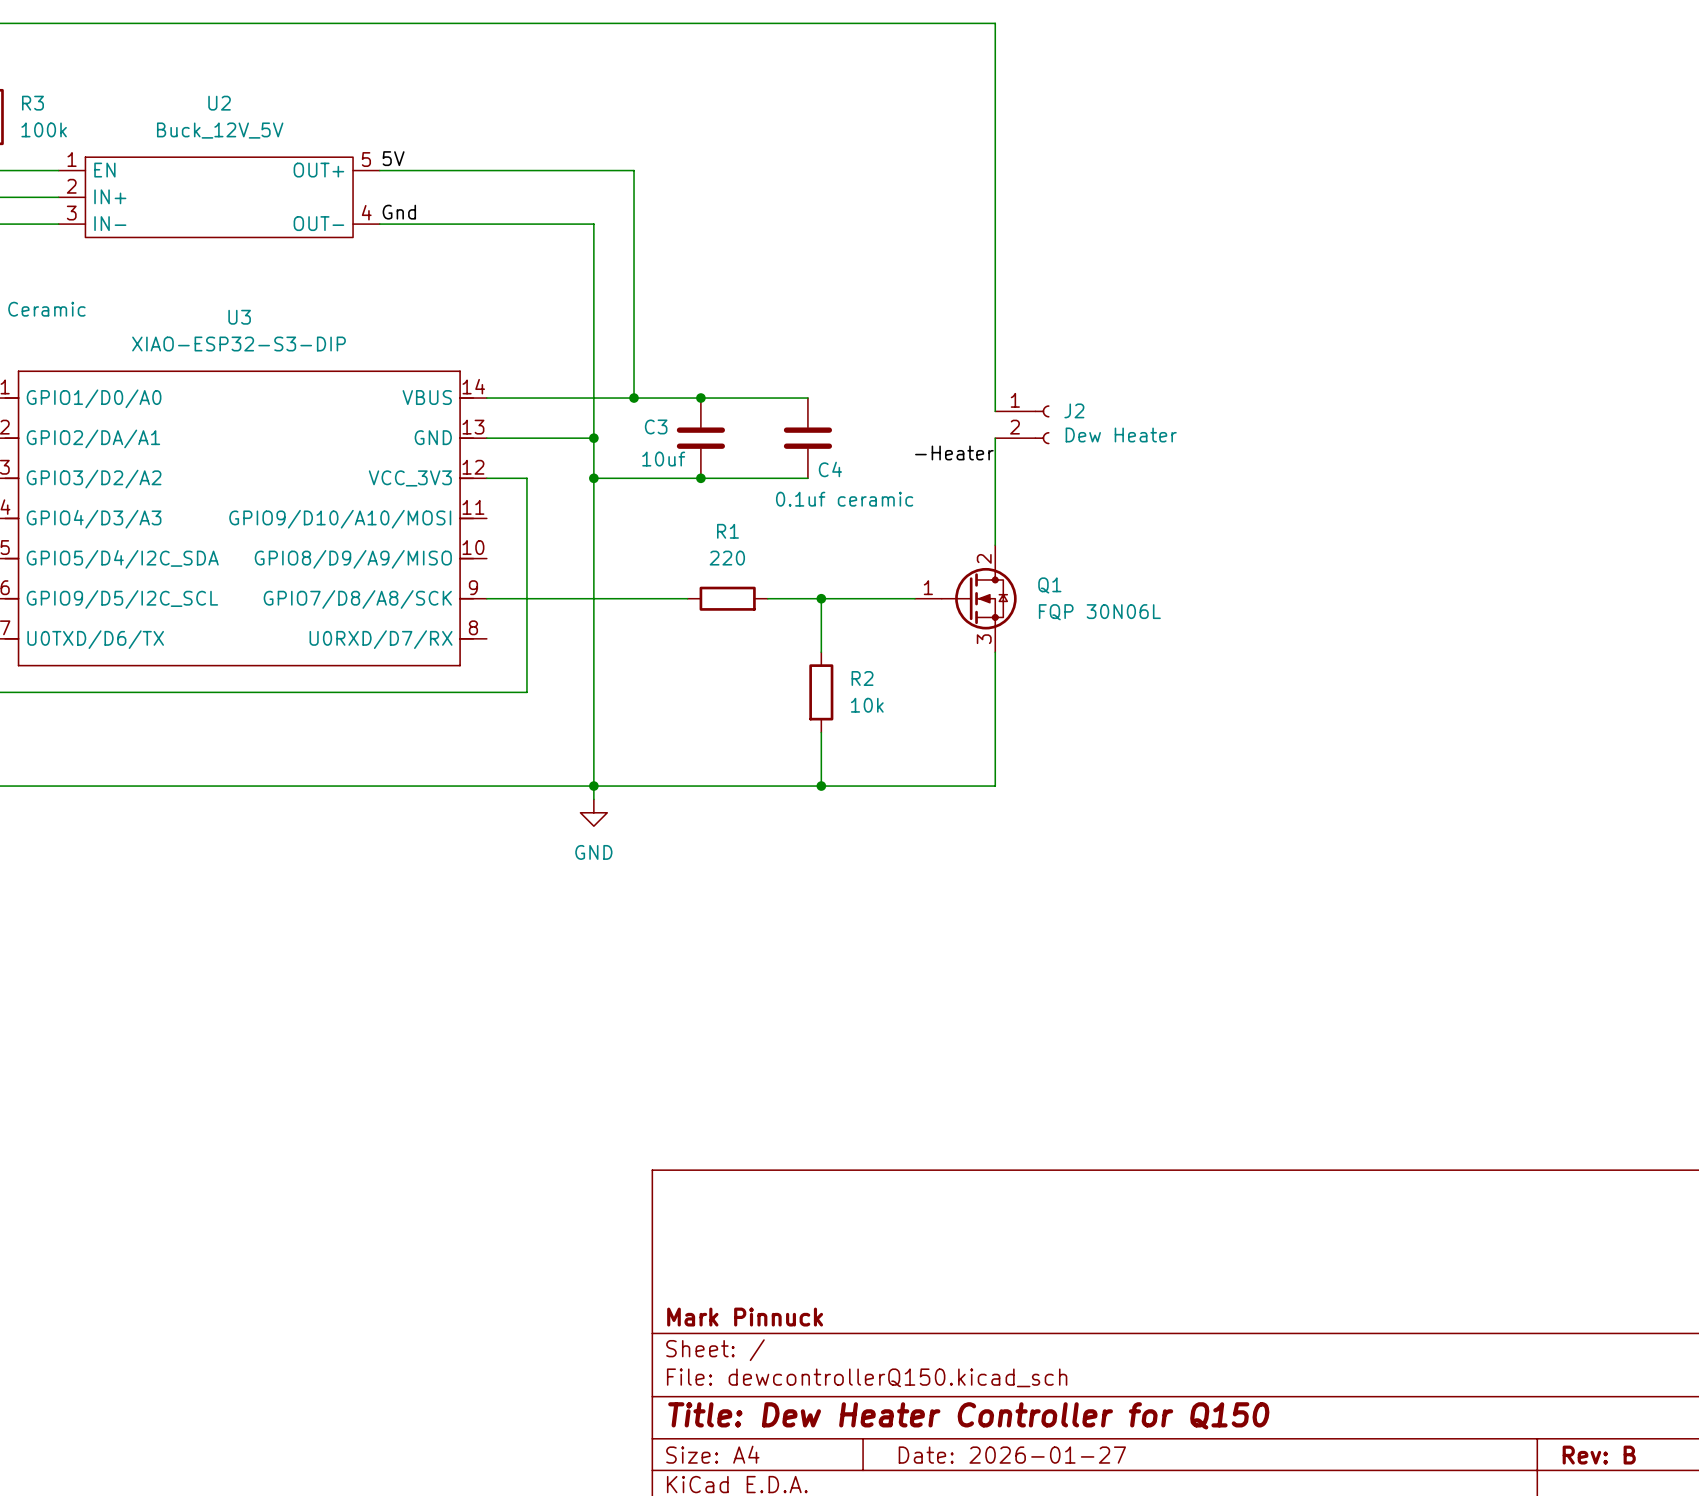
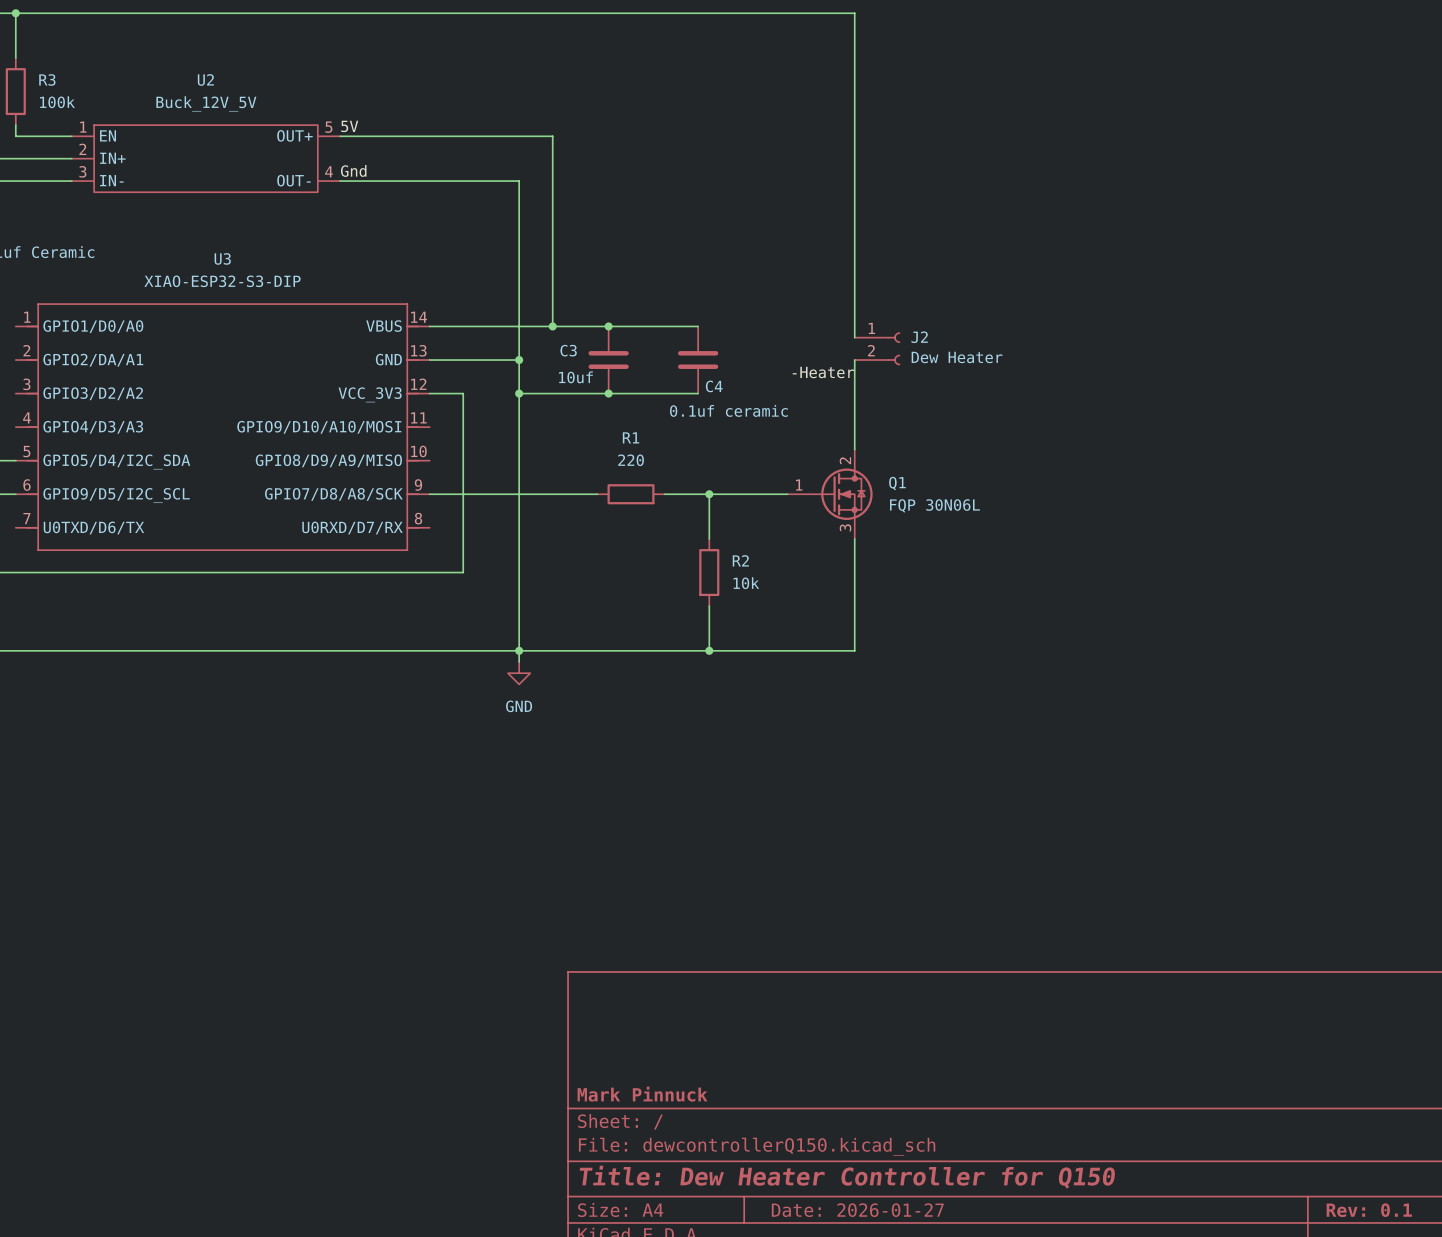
title block: Rev: B (1599, 1455) -> Rev: 0.1 (1369, 1210)

